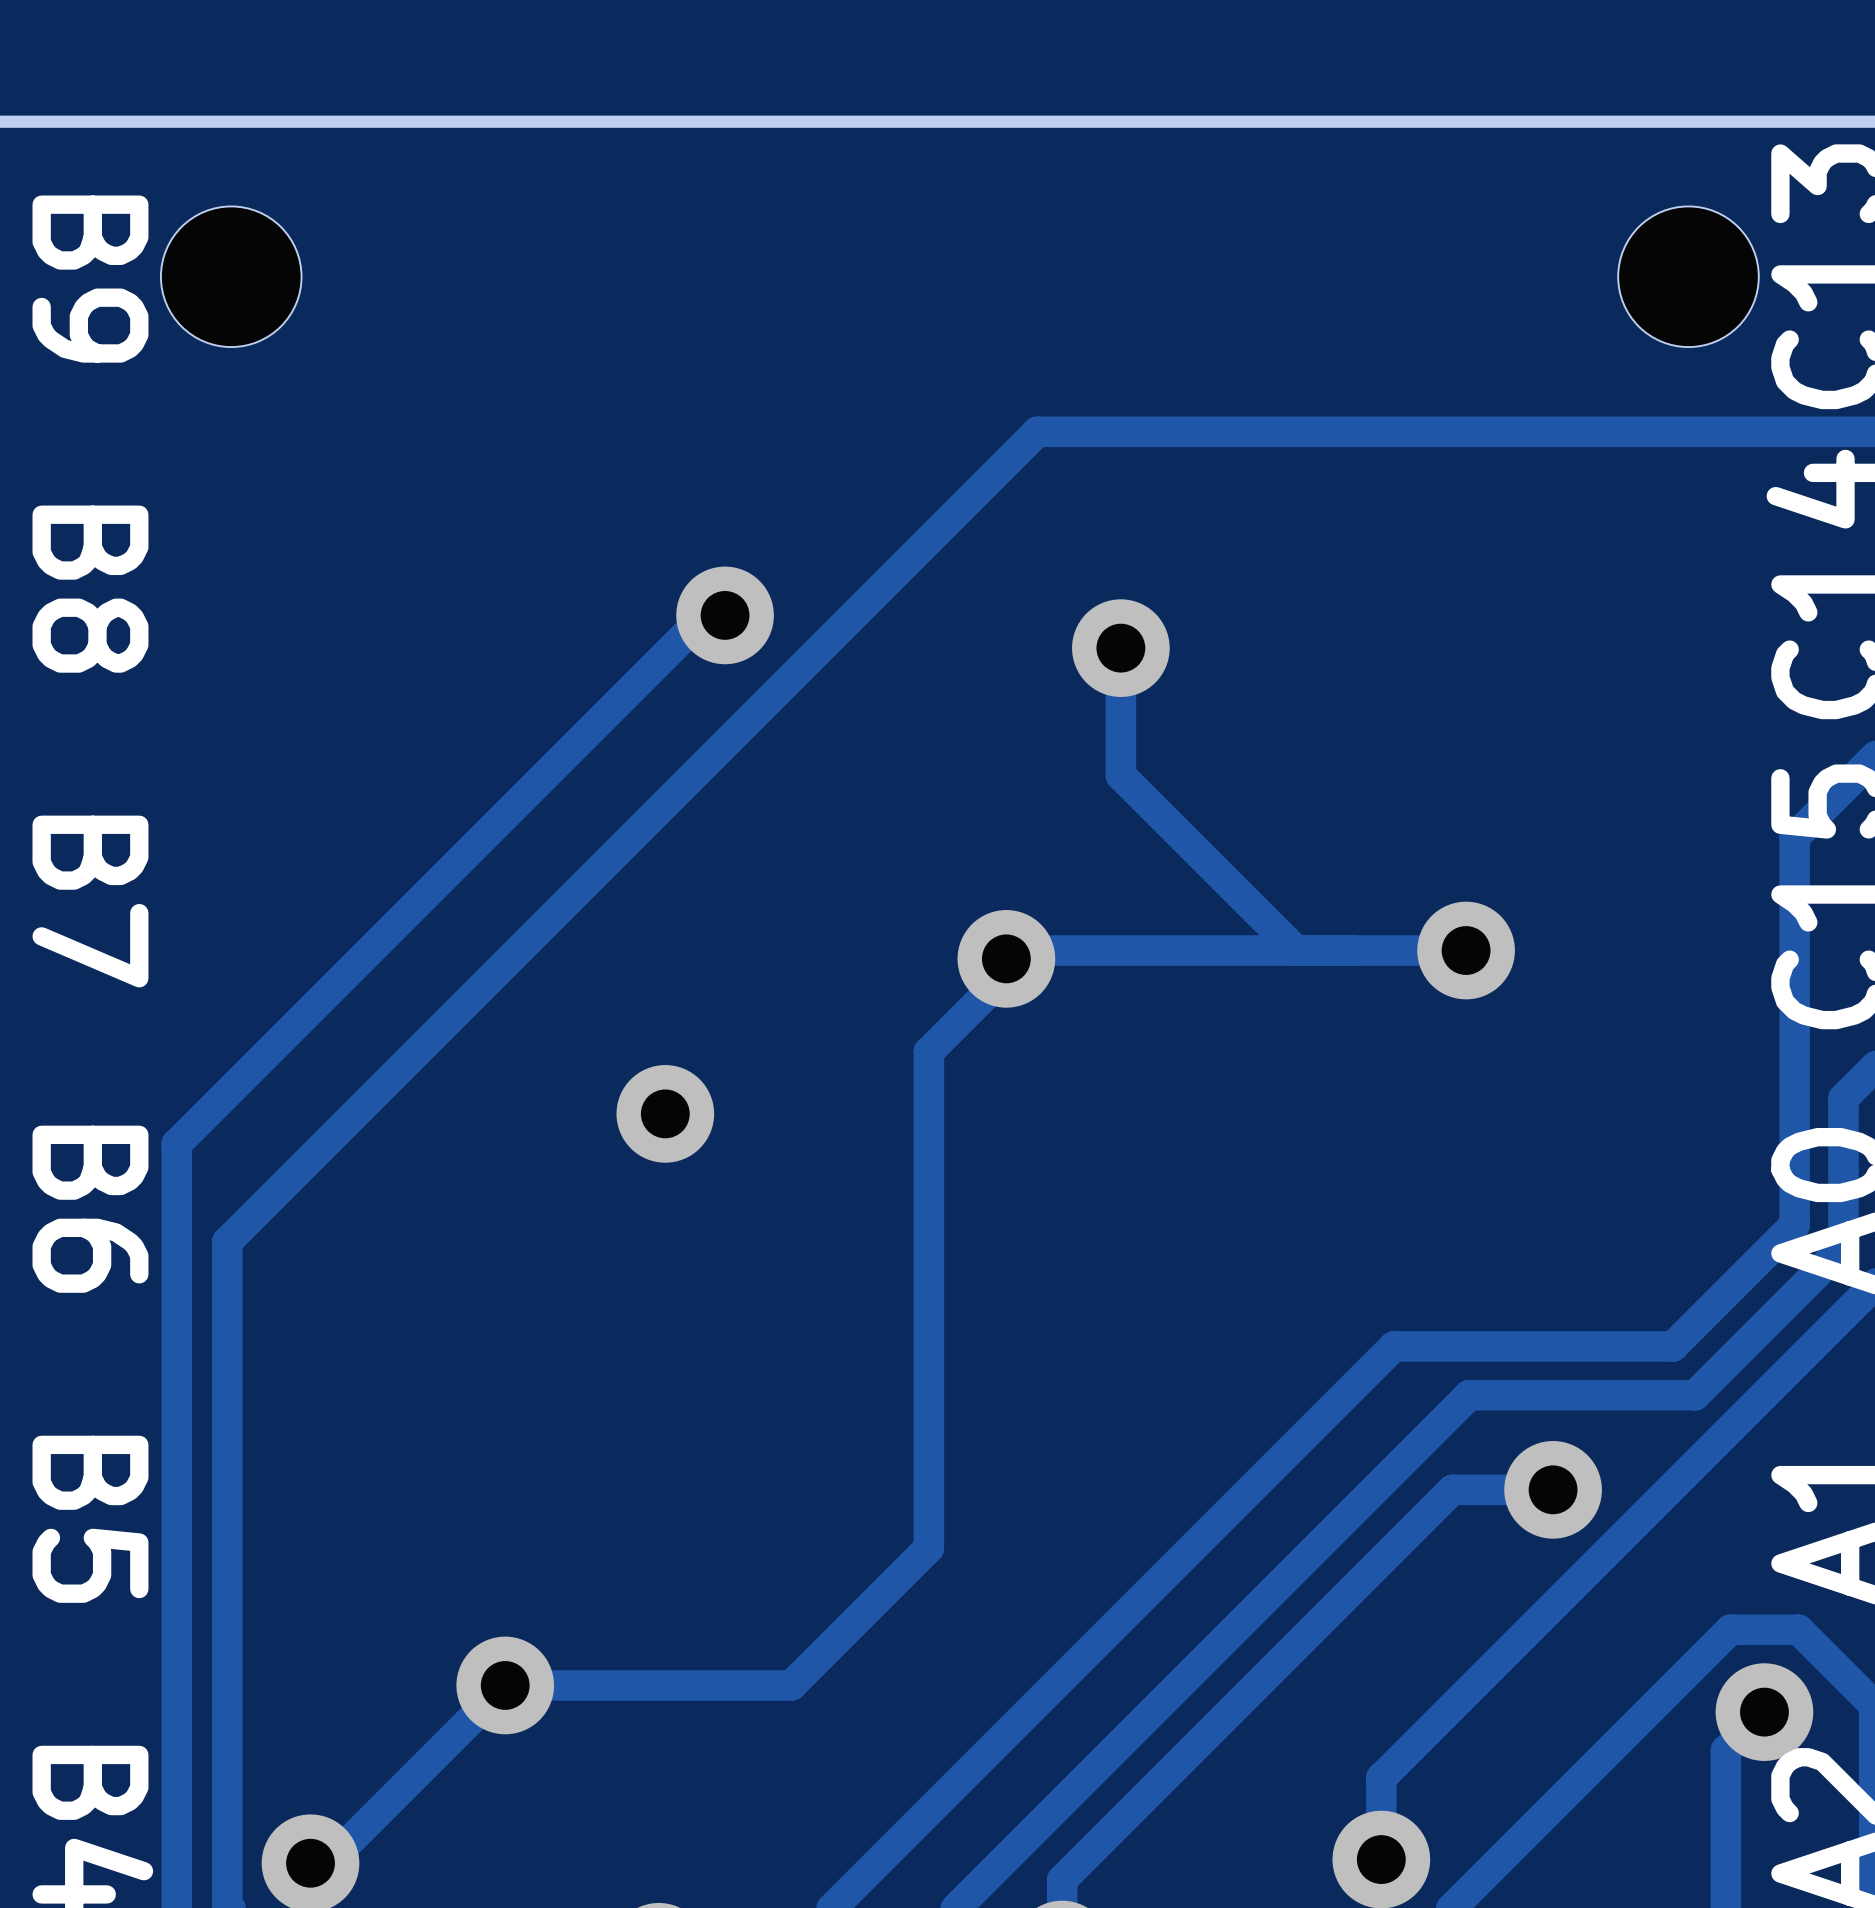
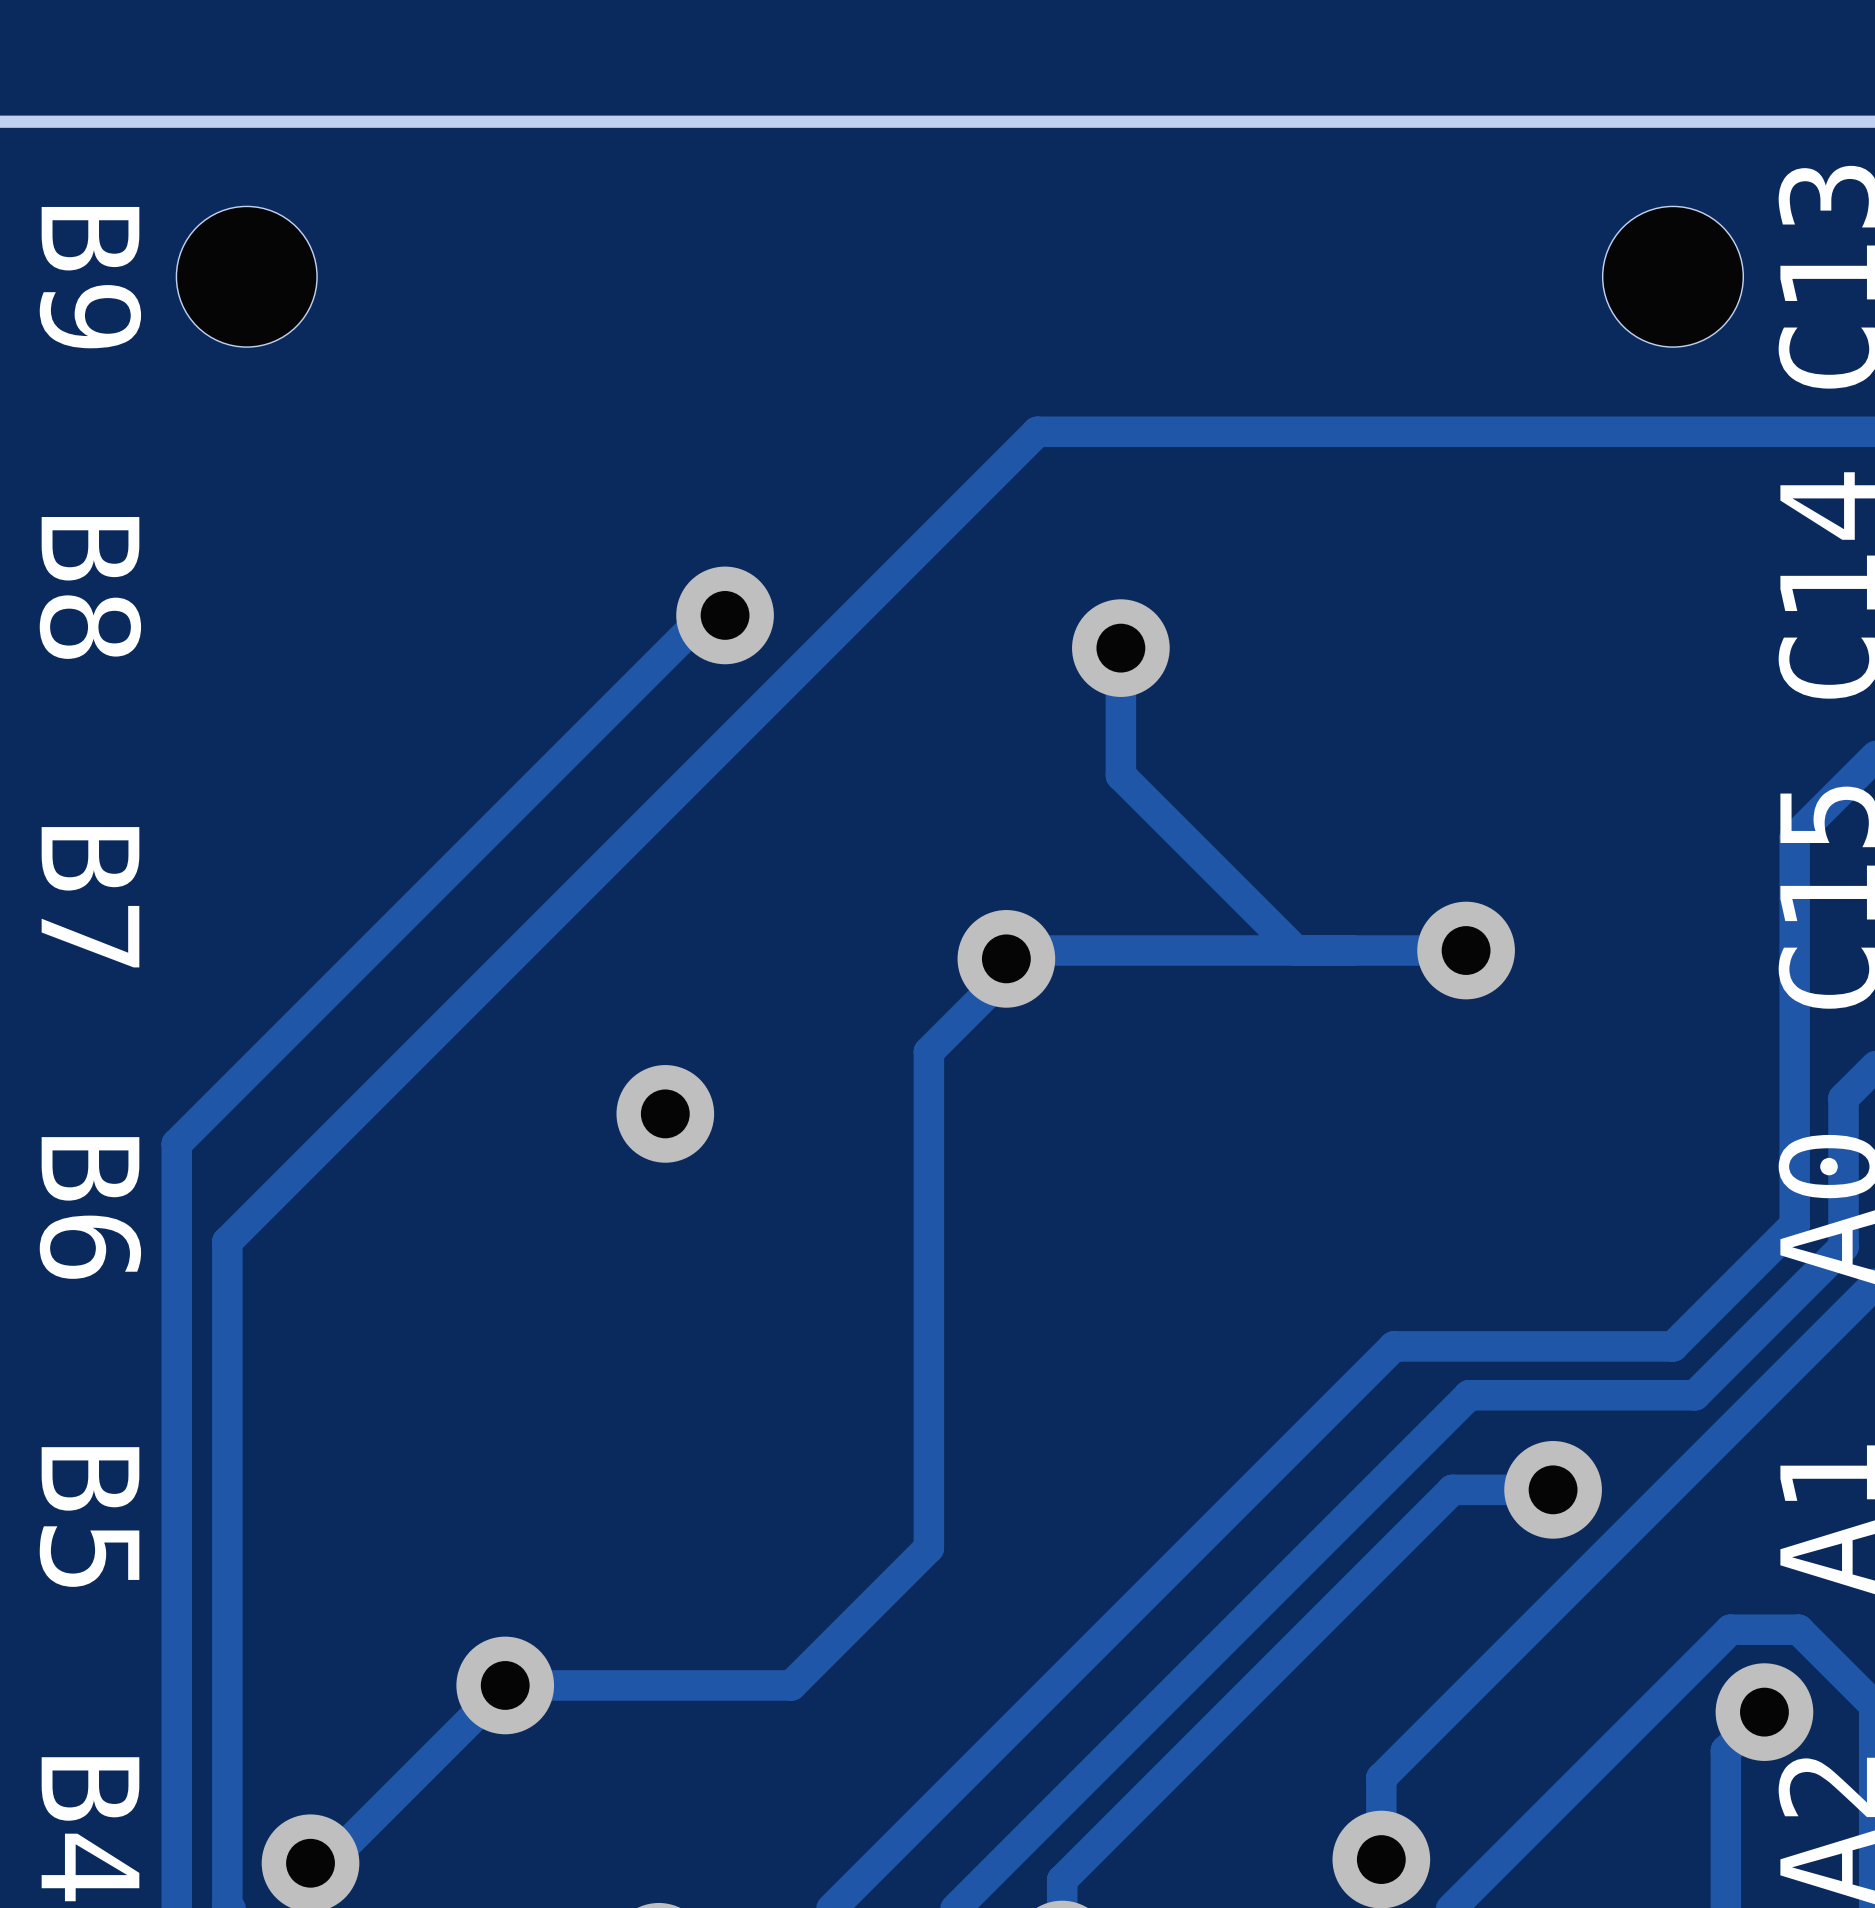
part position: (231, 276) -> (246, 276)
part position: (1688, 276) -> (1672, 276)

